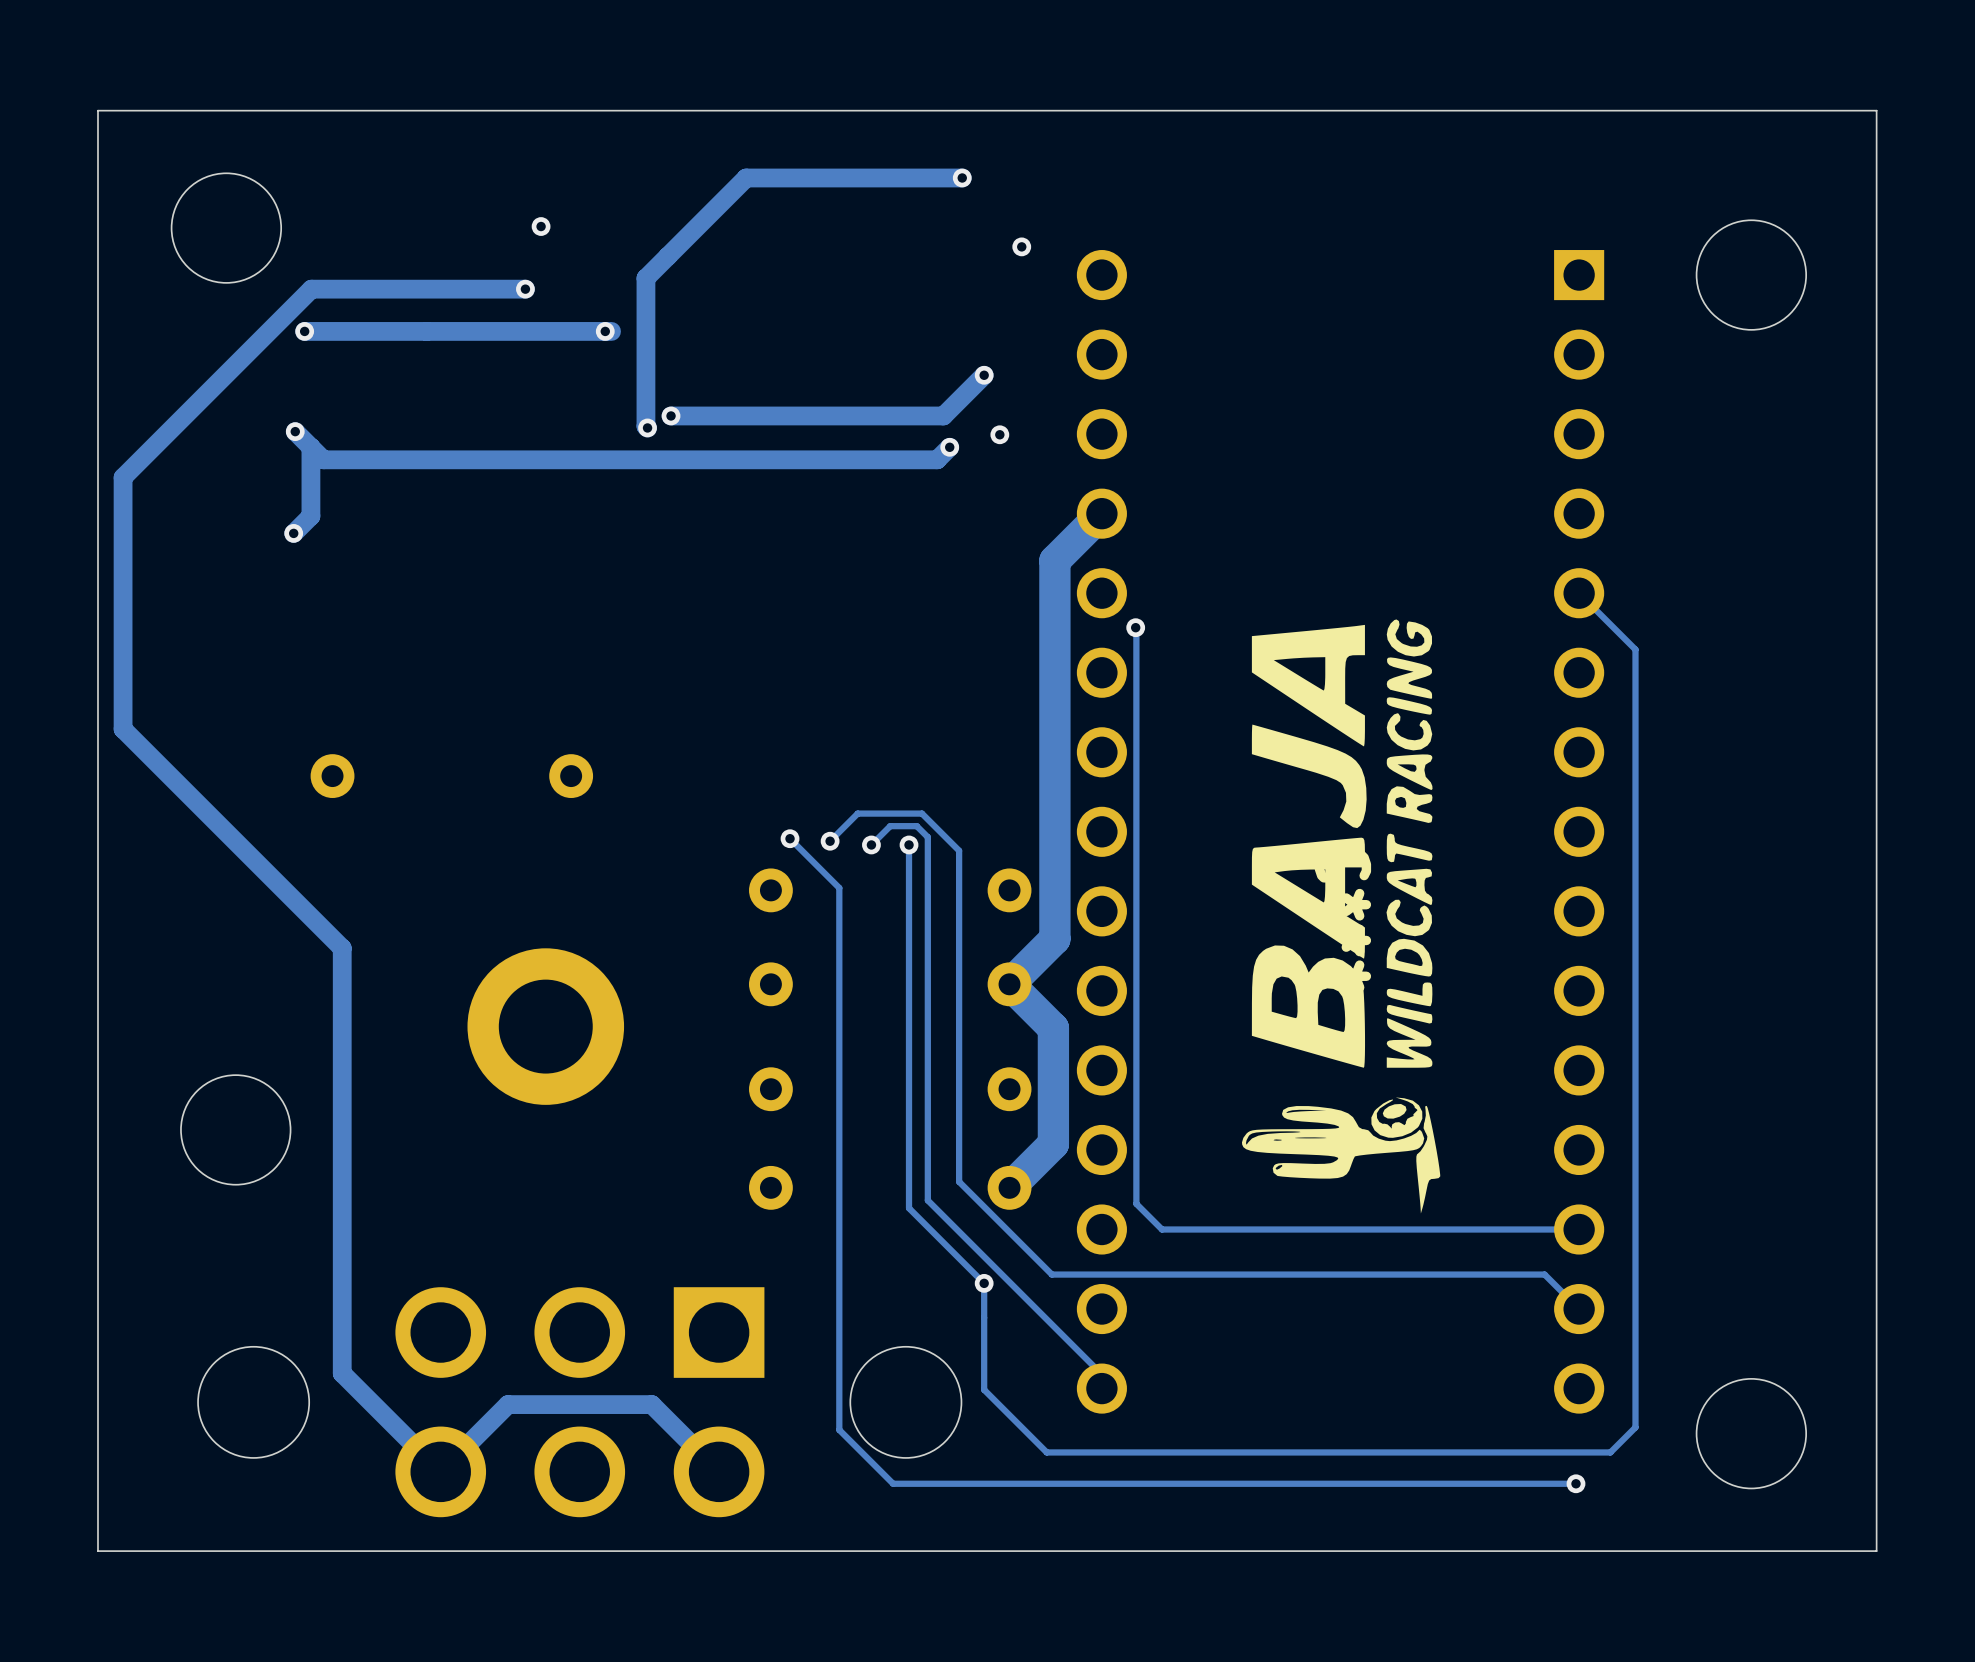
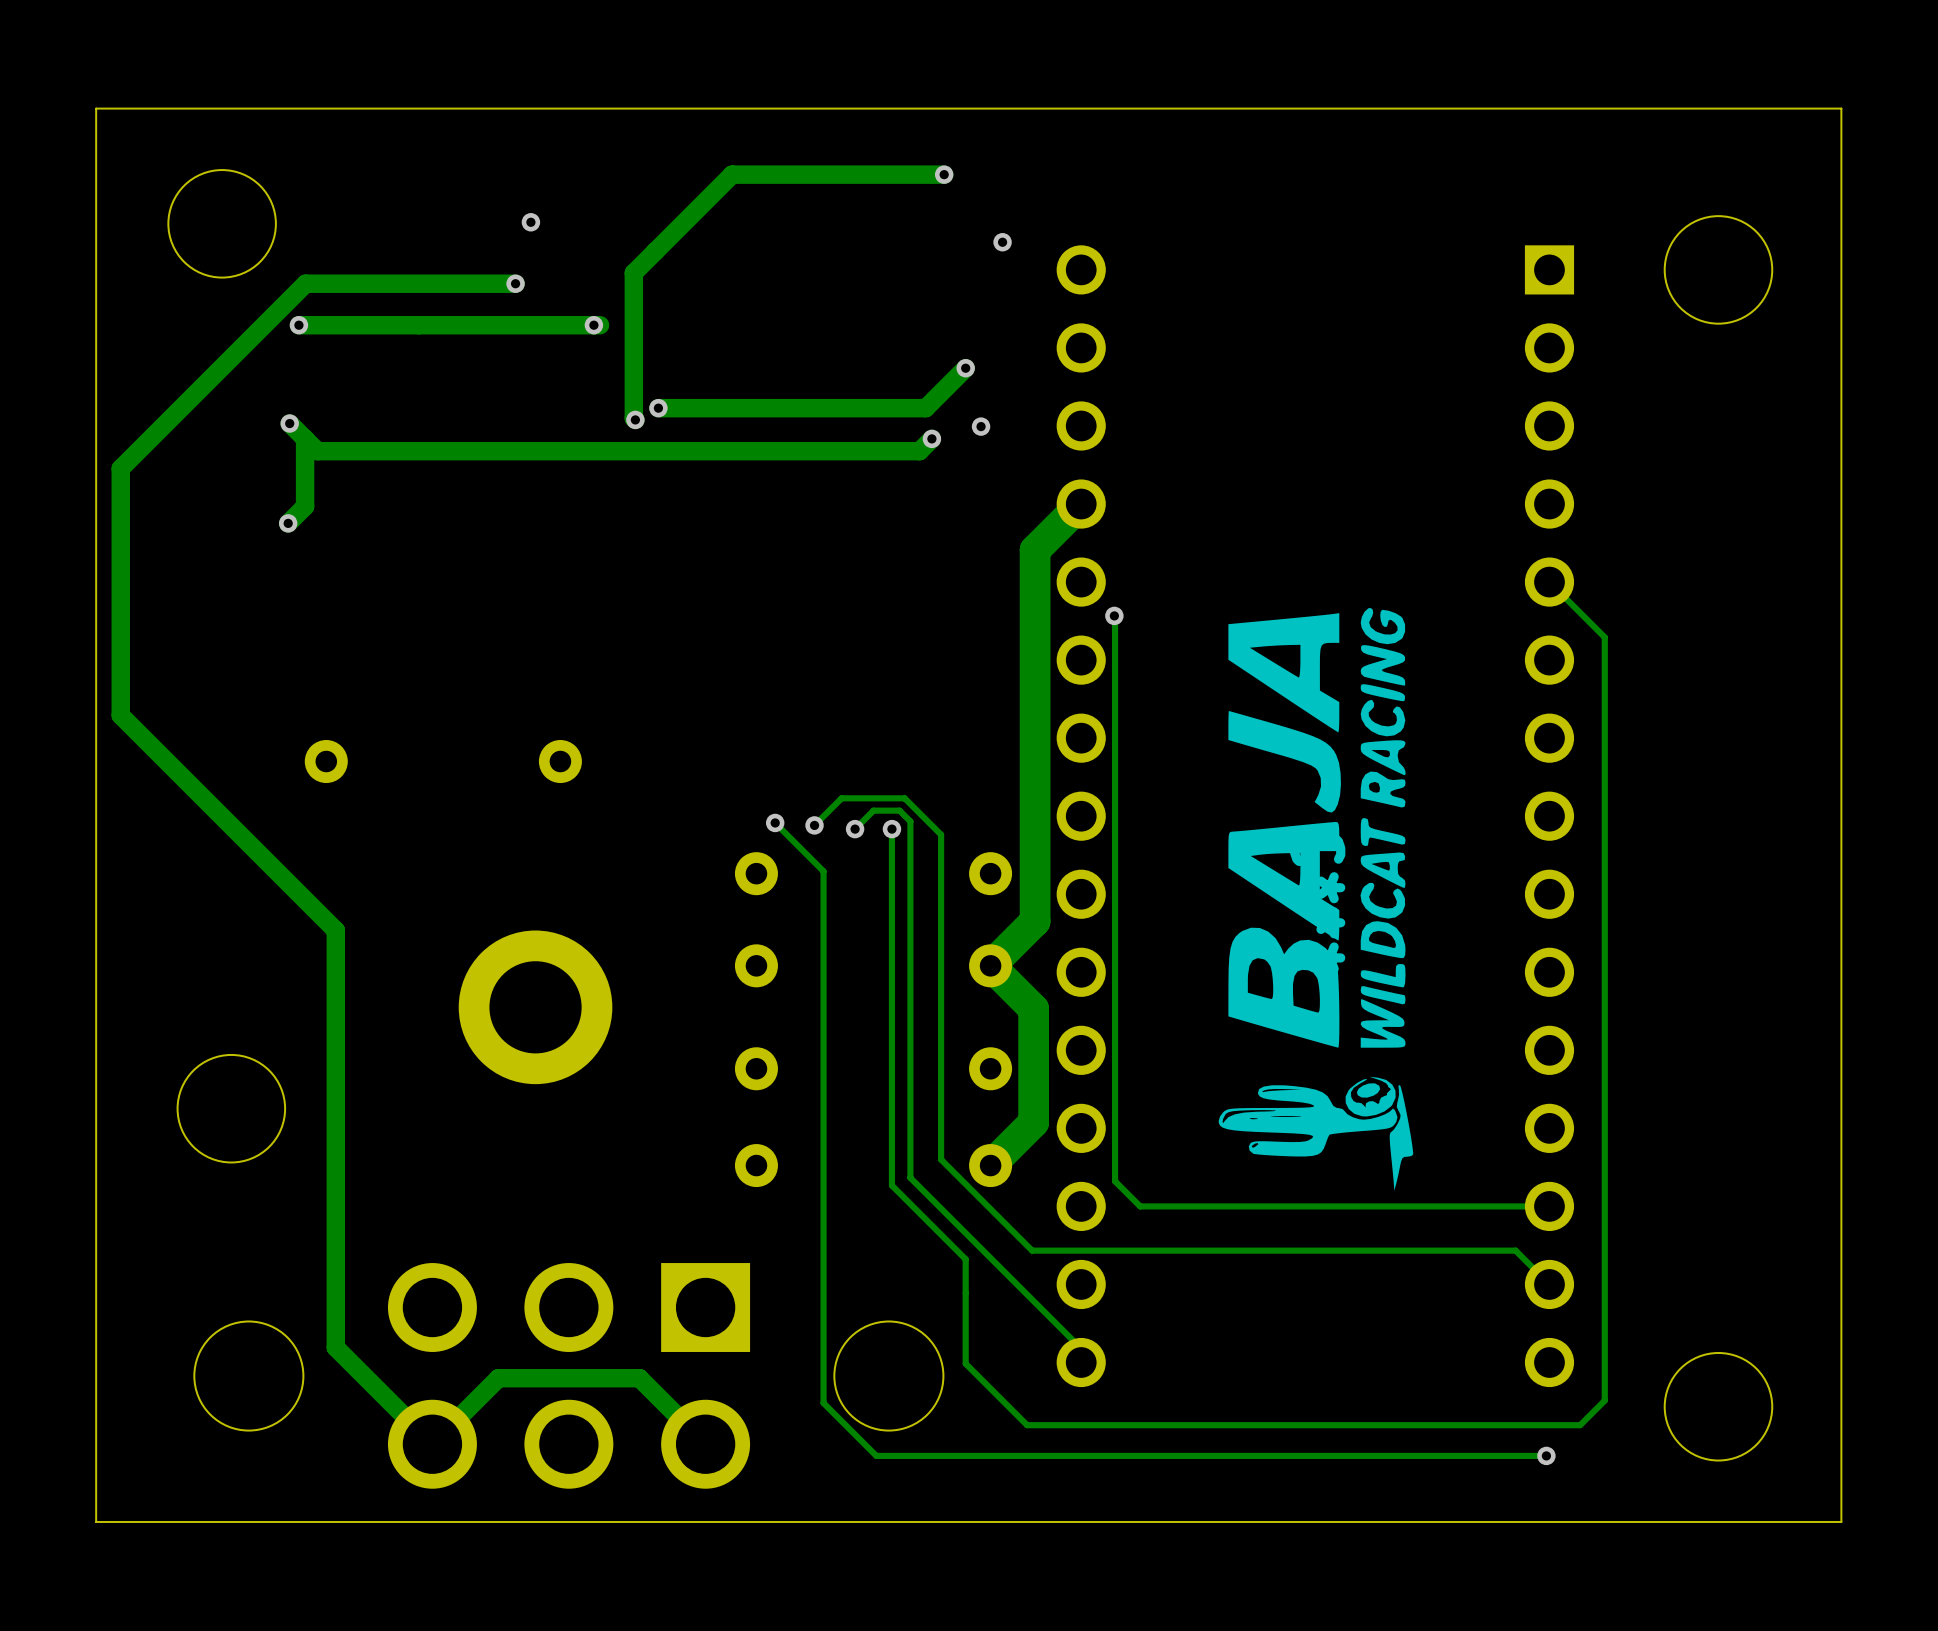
via: (984, 1283) -> none

